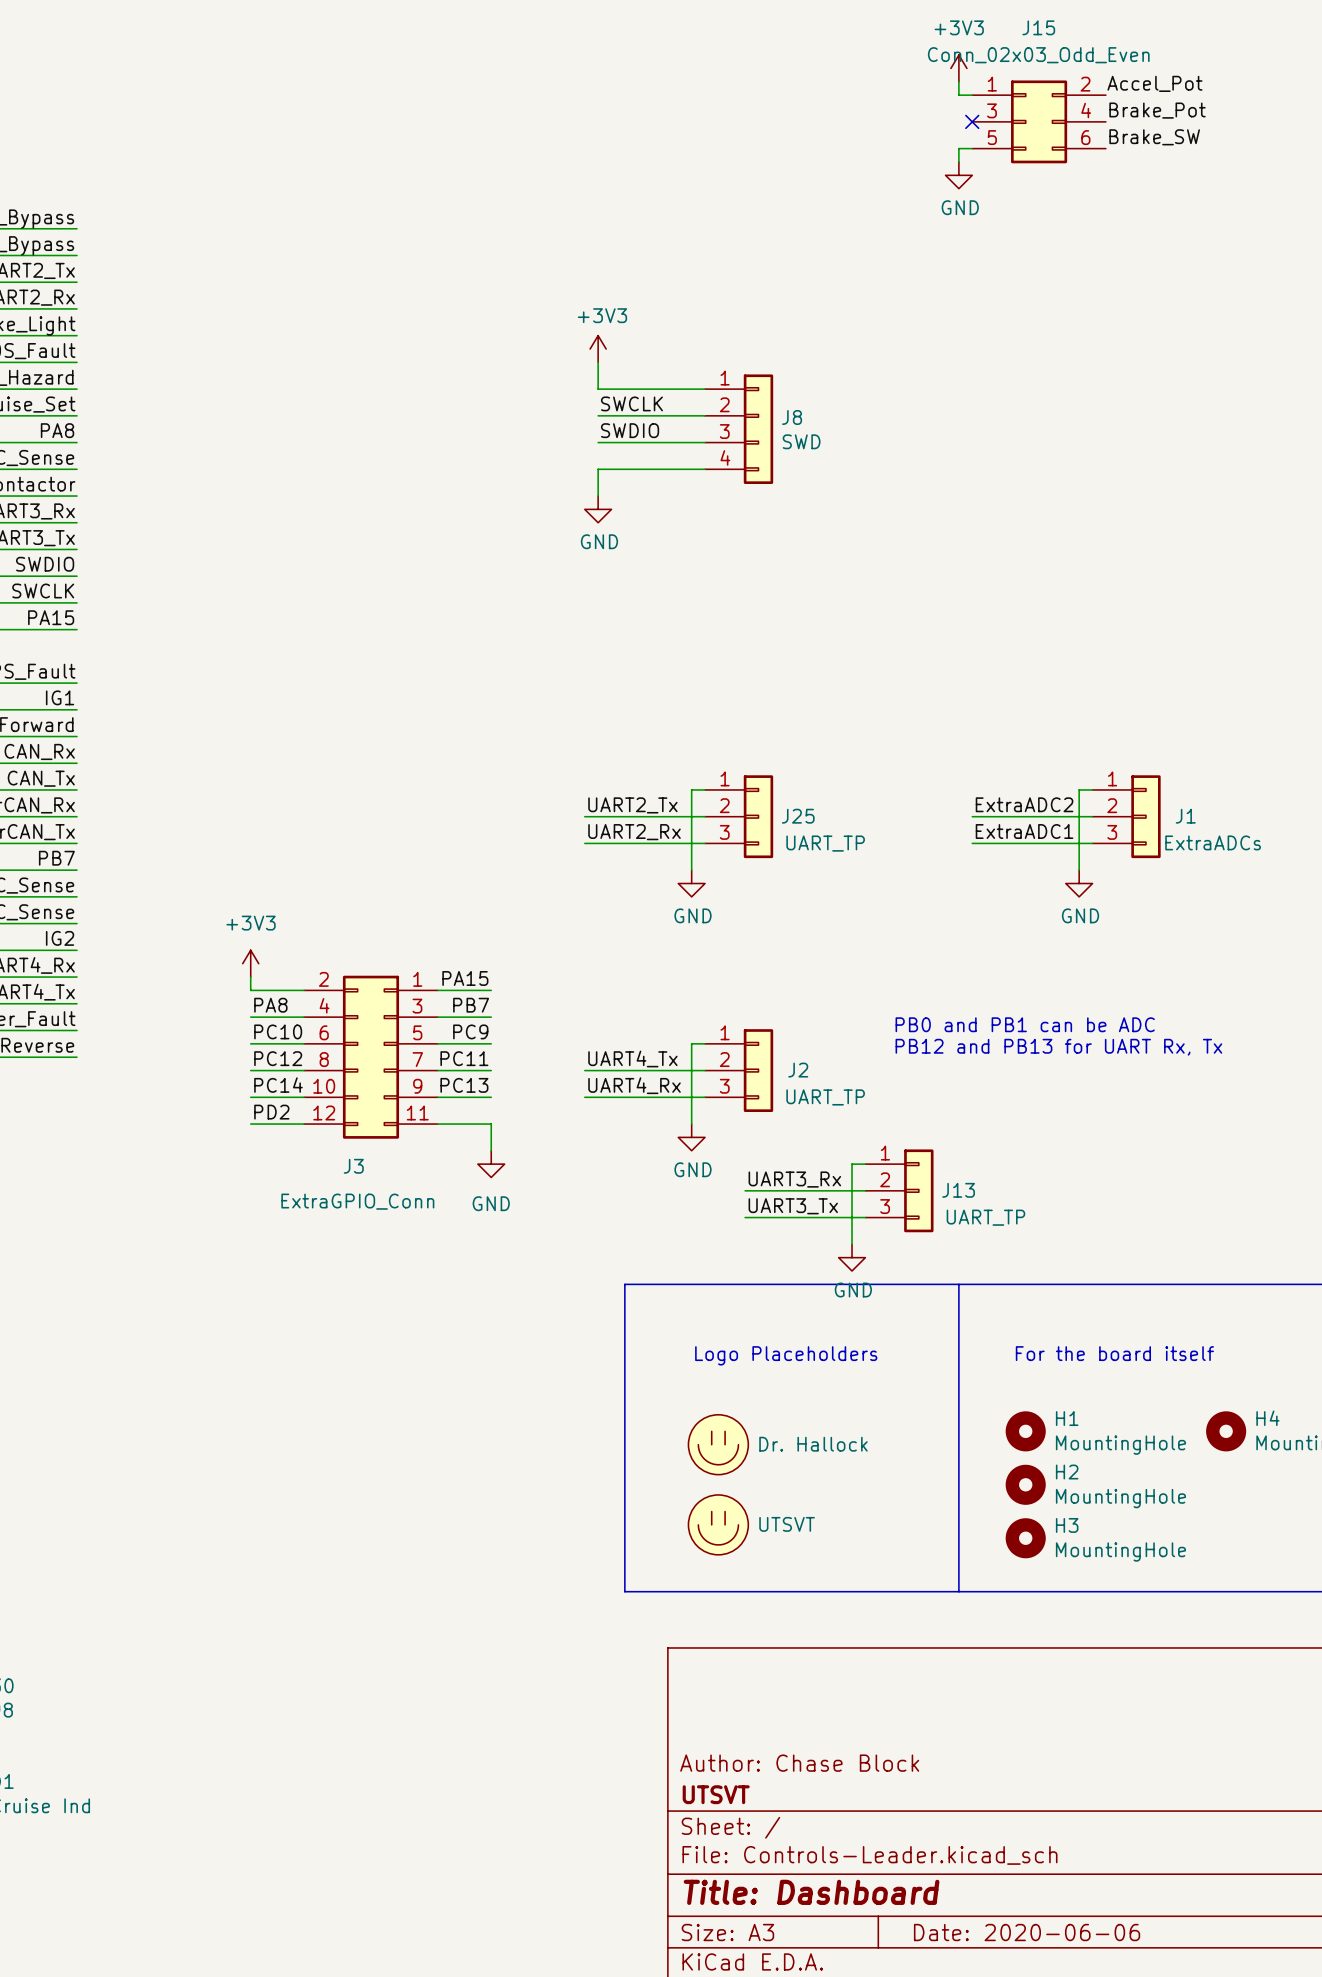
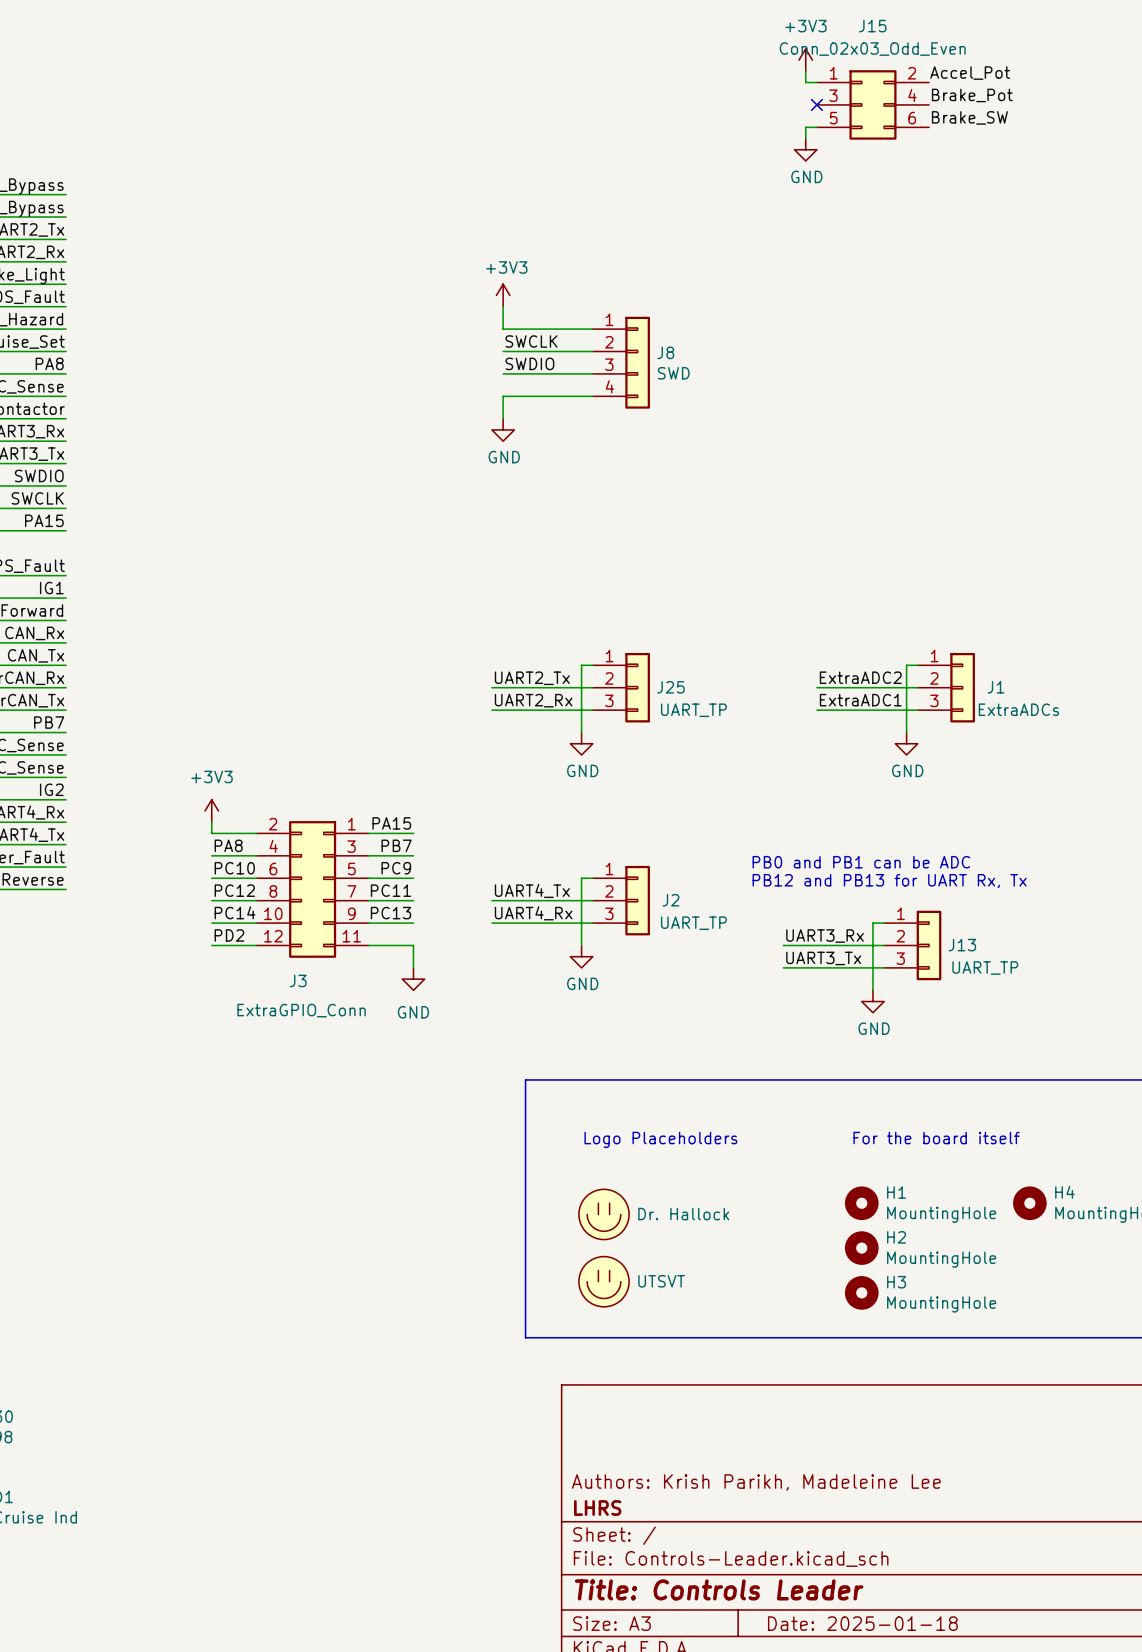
wire: (865, 1164) (852, 1164) (852, 1244) -> (884, 923) (872, 923) (872, 990)
label position: UART3_Rx (794, 1179) -> UART3_Rx (825, 936)
wire: (745, 1190) (865, 1190) -> (783, 967) (884, 967)
J13 position: (899, 1190) -> (912, 945)
label position: UART3_Tx (793, 1206) -> UART3_Tx (823, 958)
wire: (745, 1217) (865, 1217) -> (783, 945) (884, 945)
power symbol position: GND (852, 1257) -> GND (872, 1001)
line: (958, 1284) (958, 1591) -> none
title block: Author: Chase Block (799, 1763) -> Authors: Krish Parikh, Madeleine Lee (756, 1482)
title block: UTSVT (716, 1794) -> LHRS (597, 1508)
title block: Title: Dashboard (811, 1892) -> Title: Controls Leader (719, 1589)
title block: Date: 2020-06-06 (1027, 1932) -> Date: 2025-01-18 (862, 1623)

